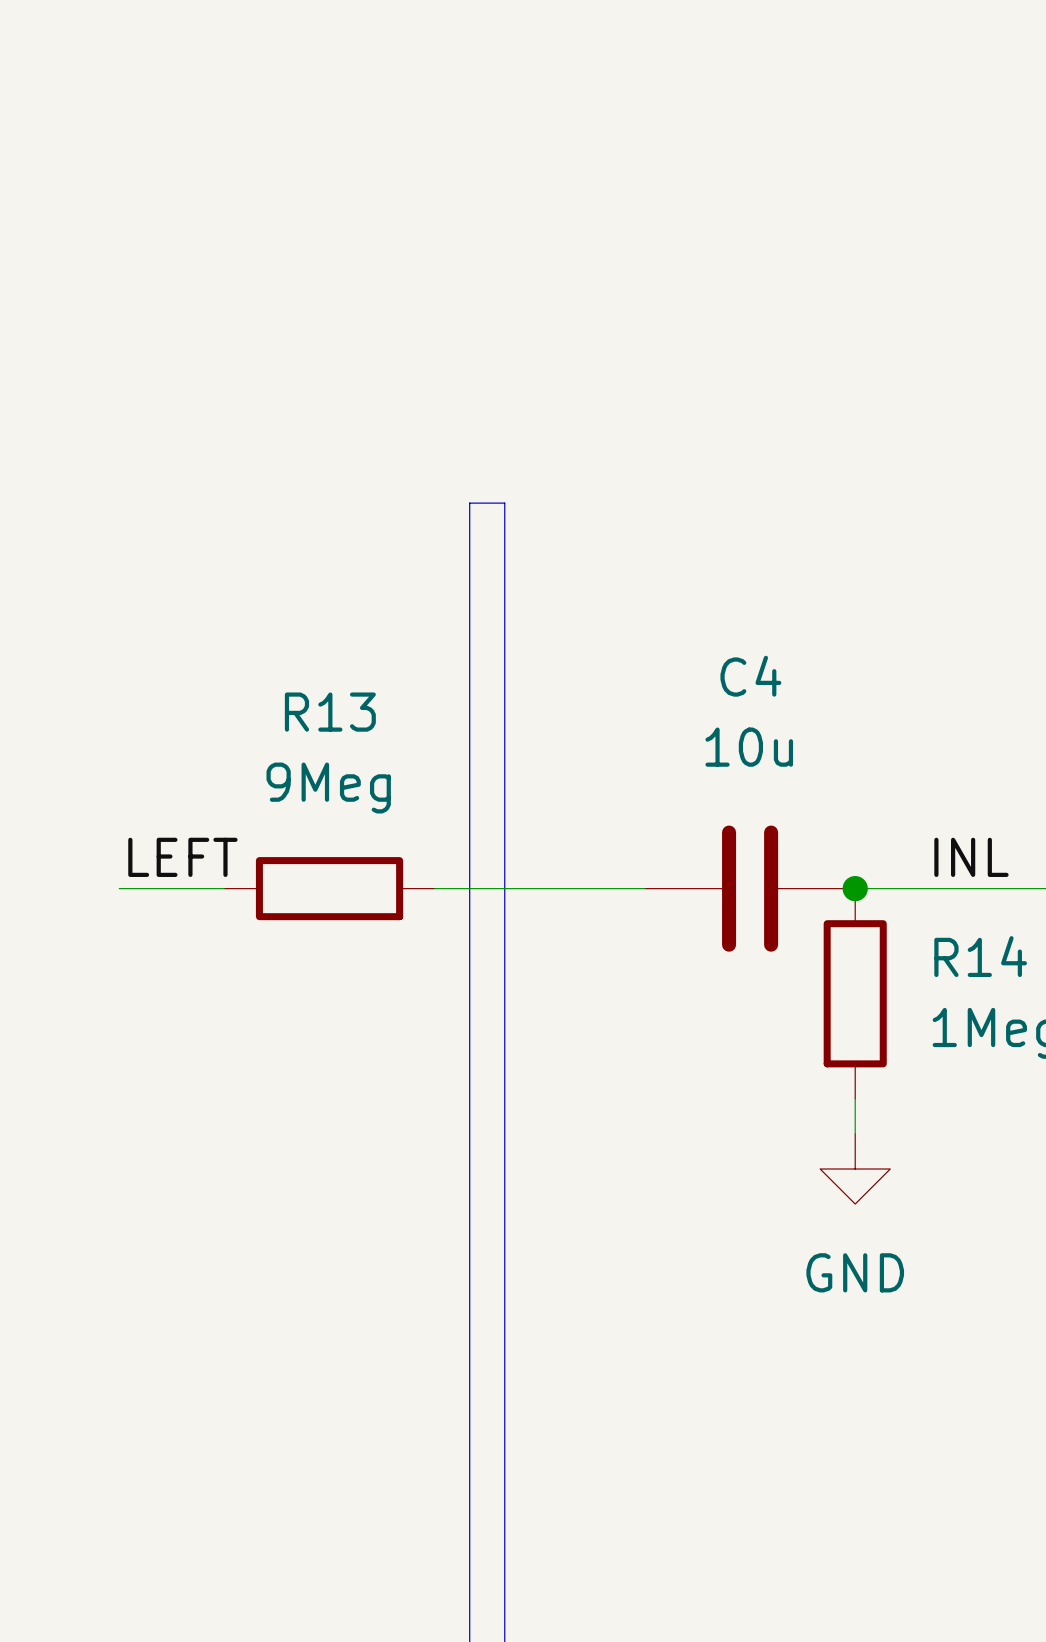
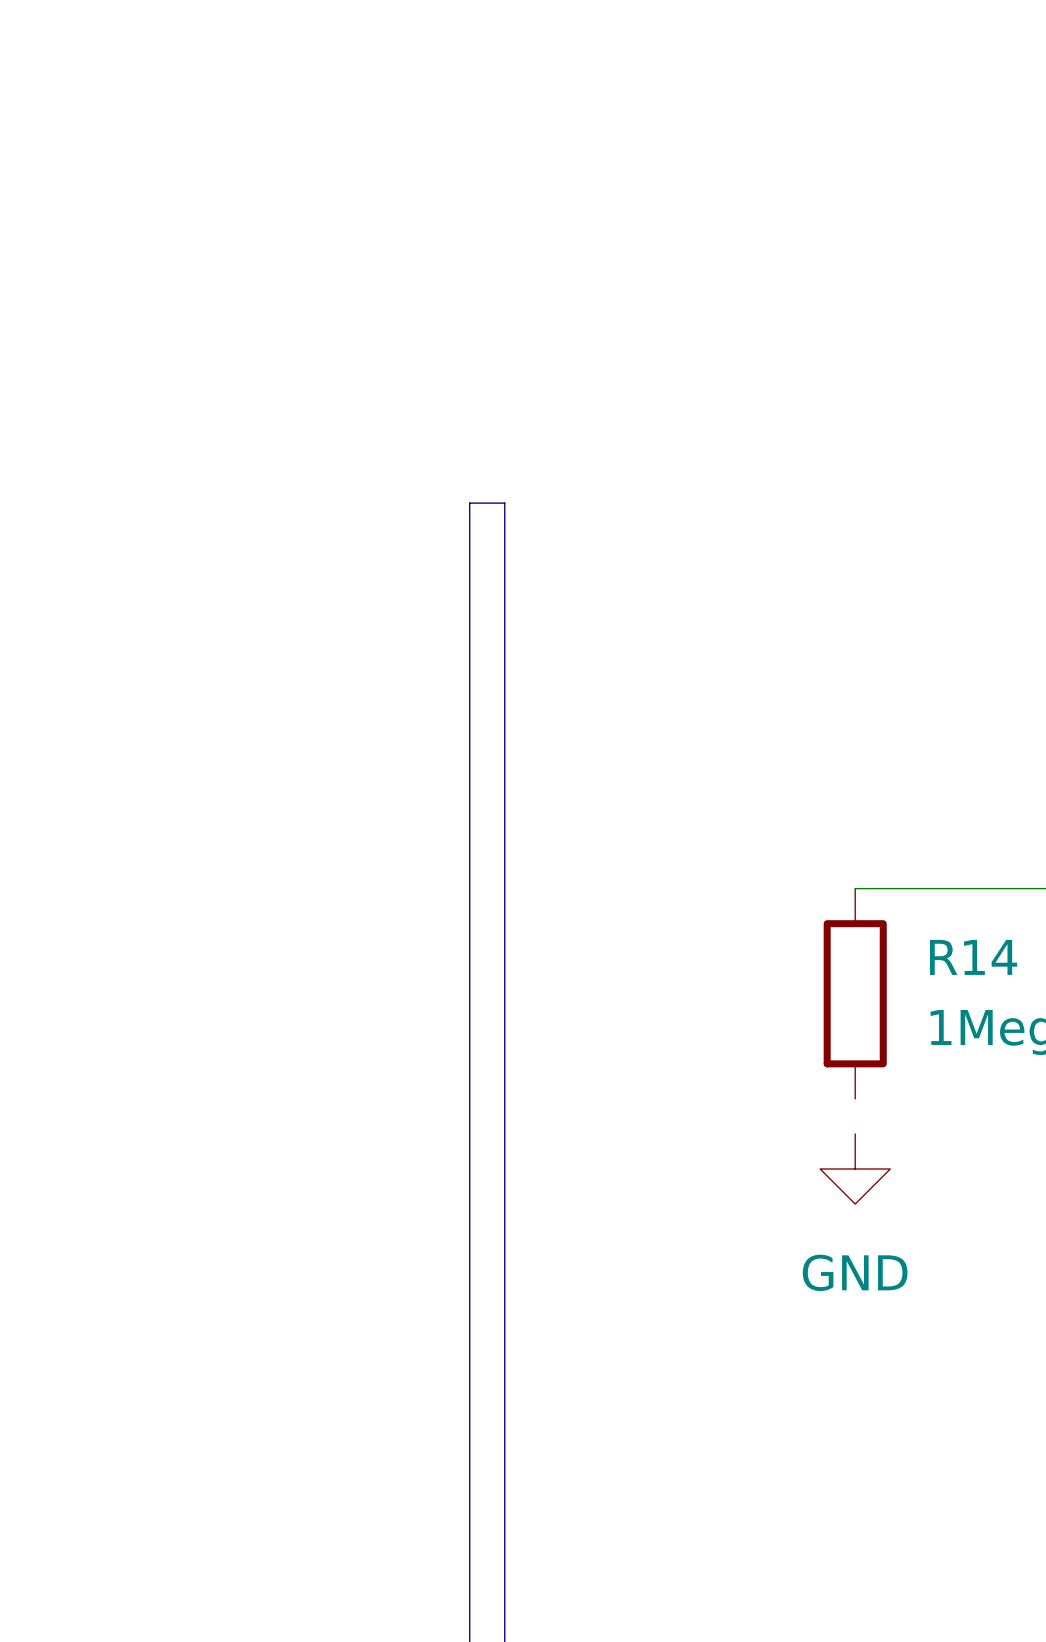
label: LEFT (182, 857) -> none
label: INL (971, 857) -> none
wire: (119, 888) (224, 888) -> none
R13: 9Meg (329, 888) -> none
wire: (434, 888) (644, 888) -> none
C4: 10u (750, 888) -> none
junction: (855, 888) -> none
wire: (855, 1098) (855, 1133) -> none

